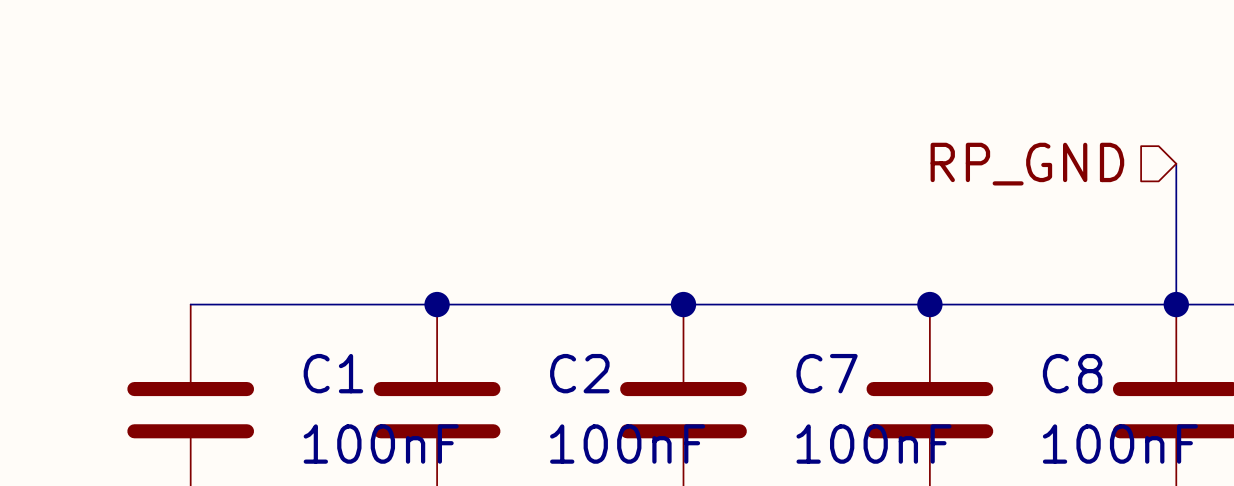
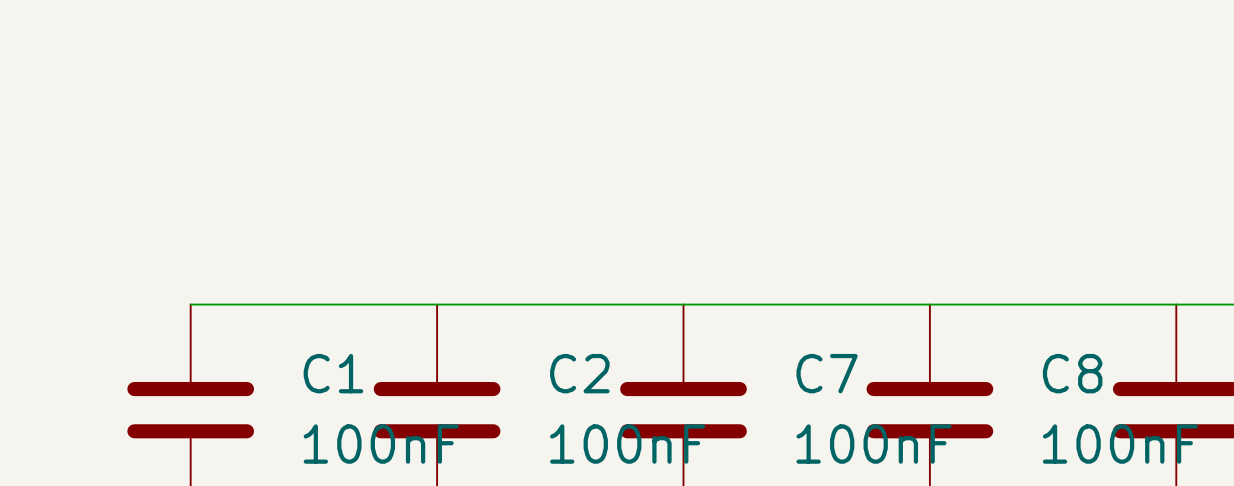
wire: (1176, 163) (1176, 304) -> none
hierarchical label: RP_GND (1027, 164) -> none
junction: (437, 304) -> none
junction: (683, 304) -> none
junction: (929, 304) -> none
junction: (1176, 304) -> none

